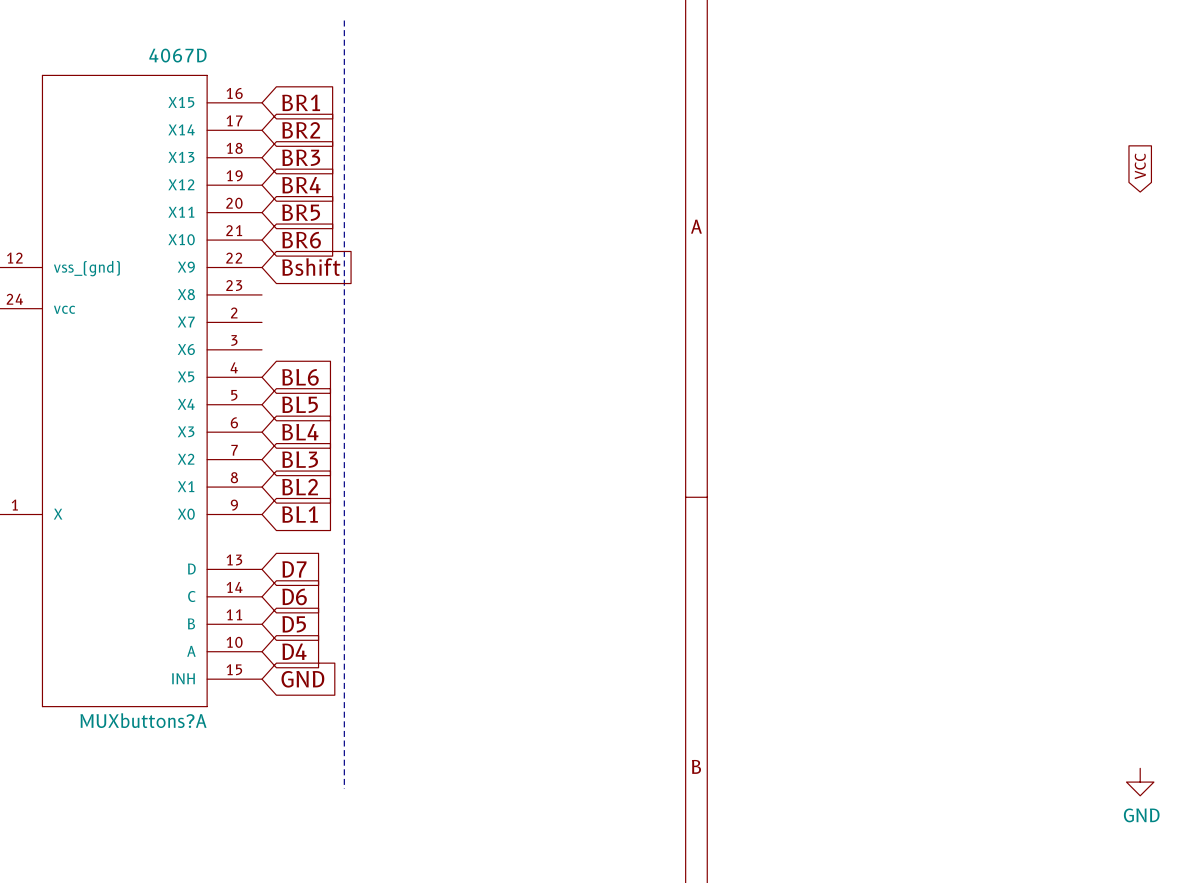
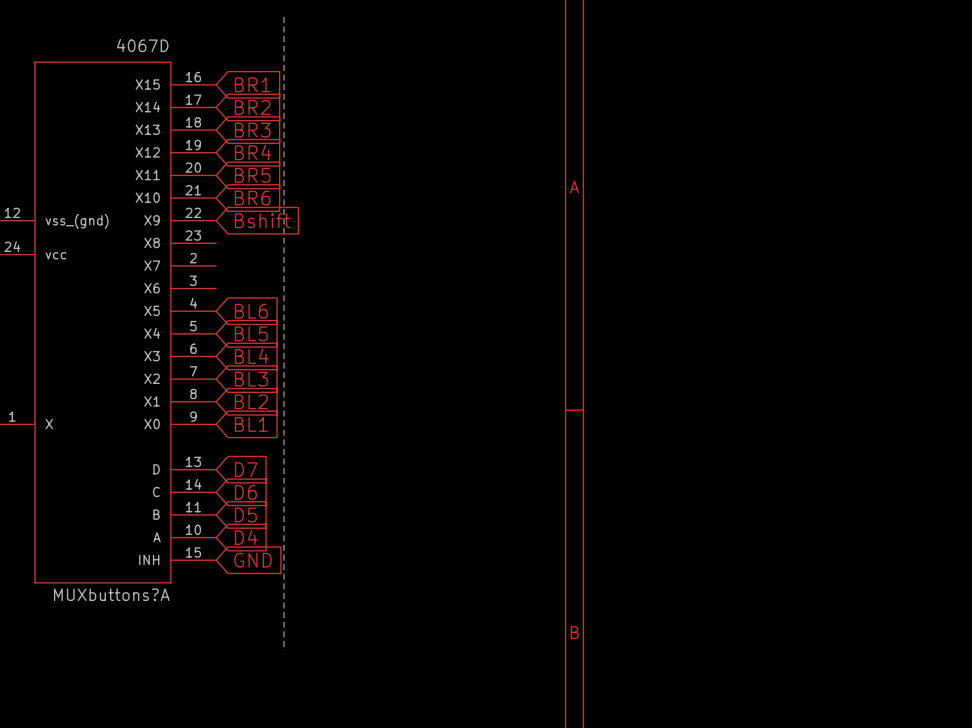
global label: VCC (1140, 166) -> none
power symbol: GND (1140, 782) -> none

